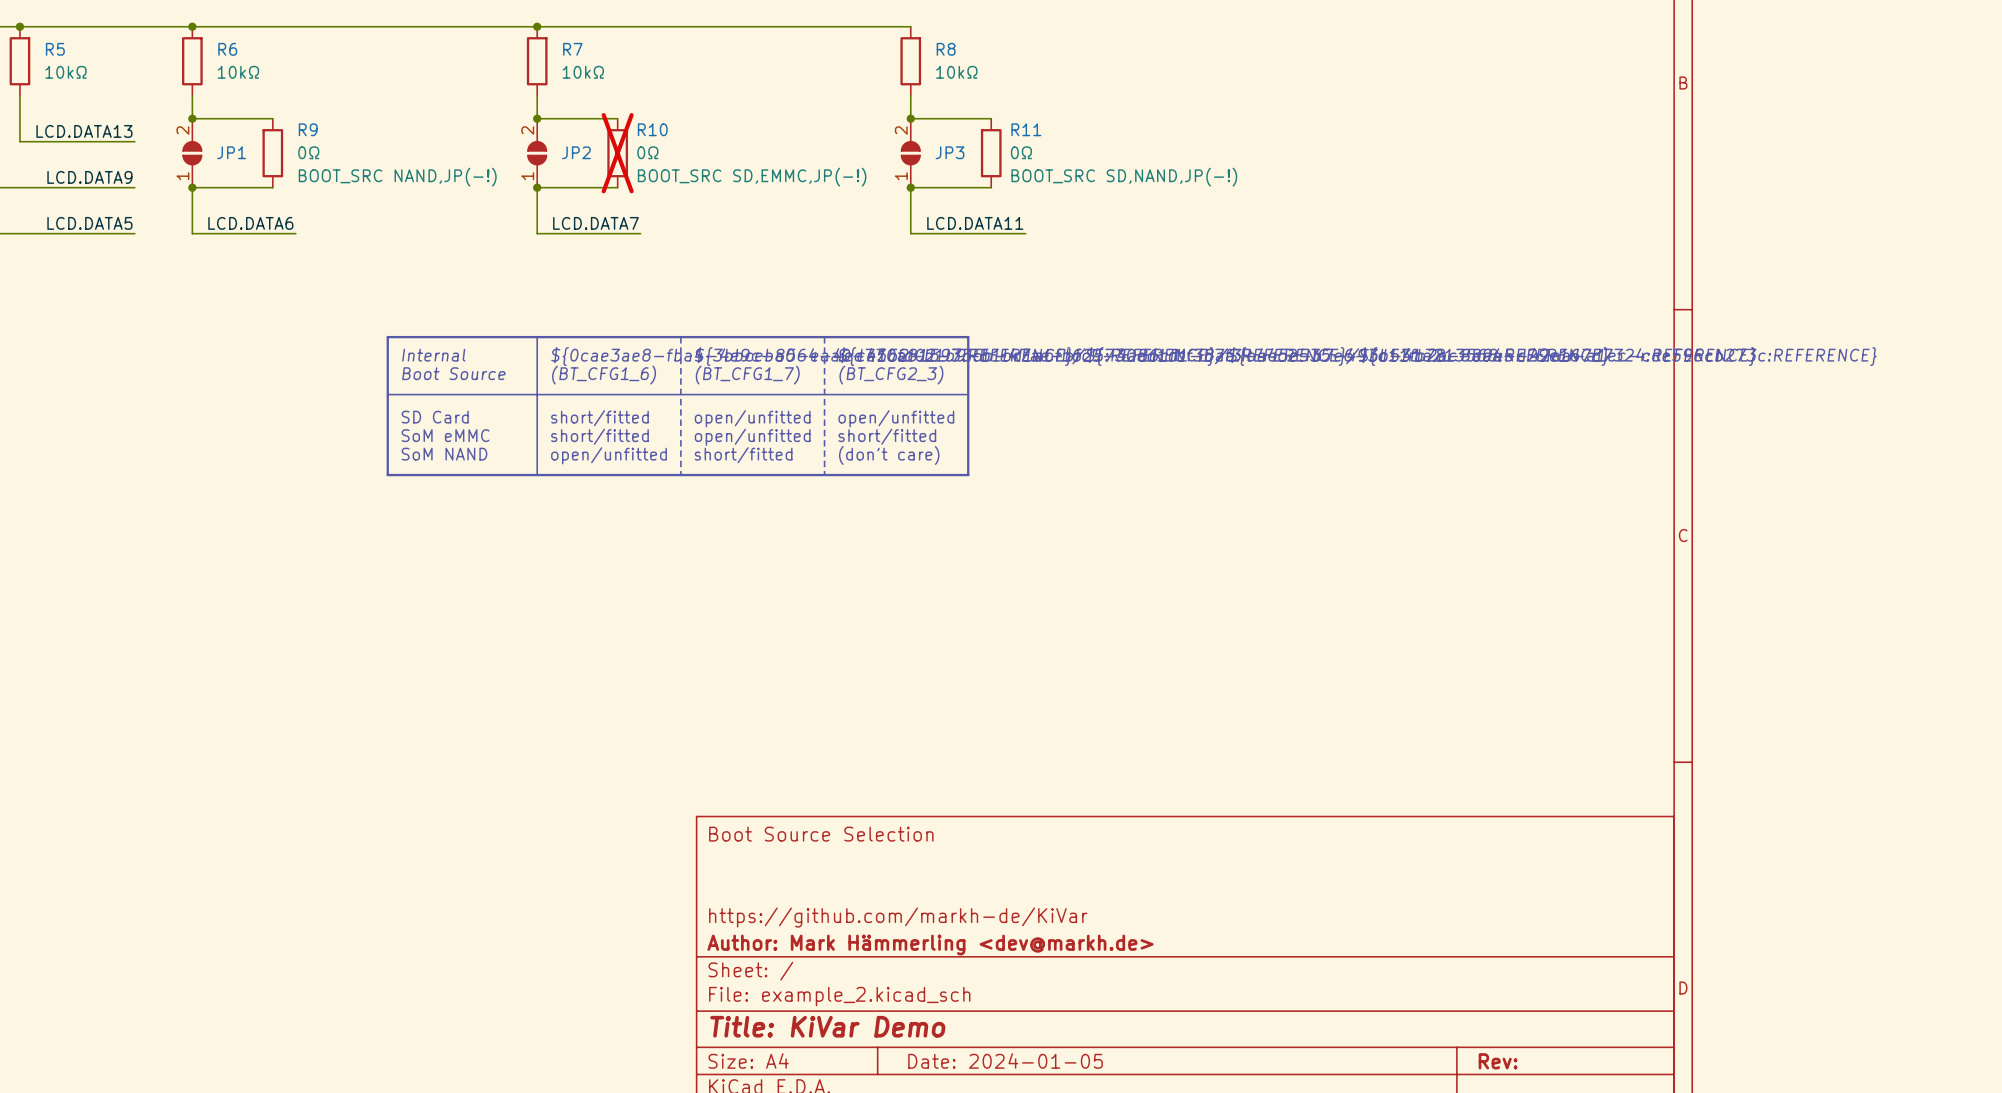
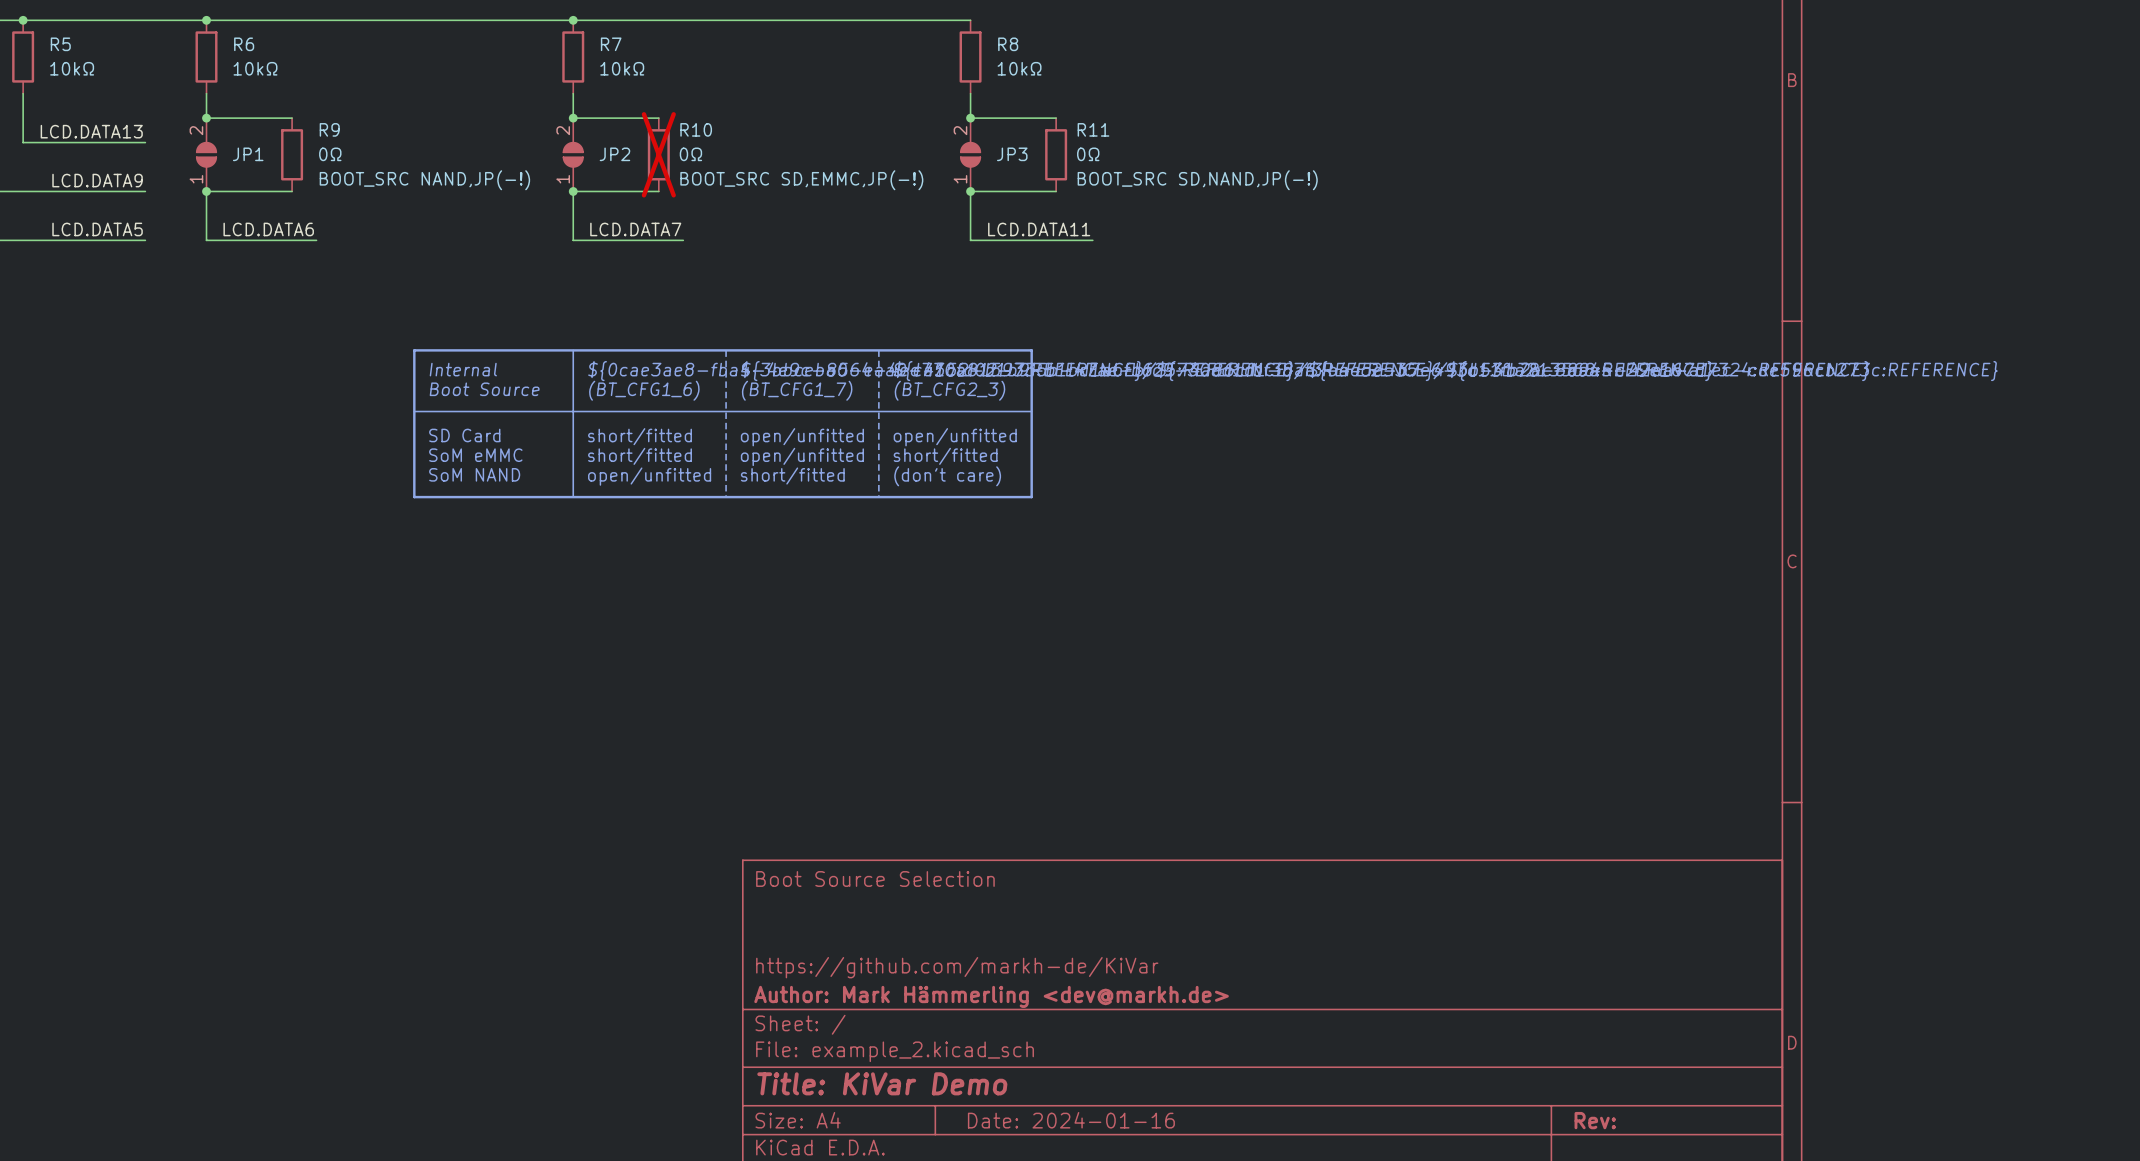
title block: Date: 2024-01-05 (1005, 1060) -> Date: 2024-01-16 (1071, 1120)

